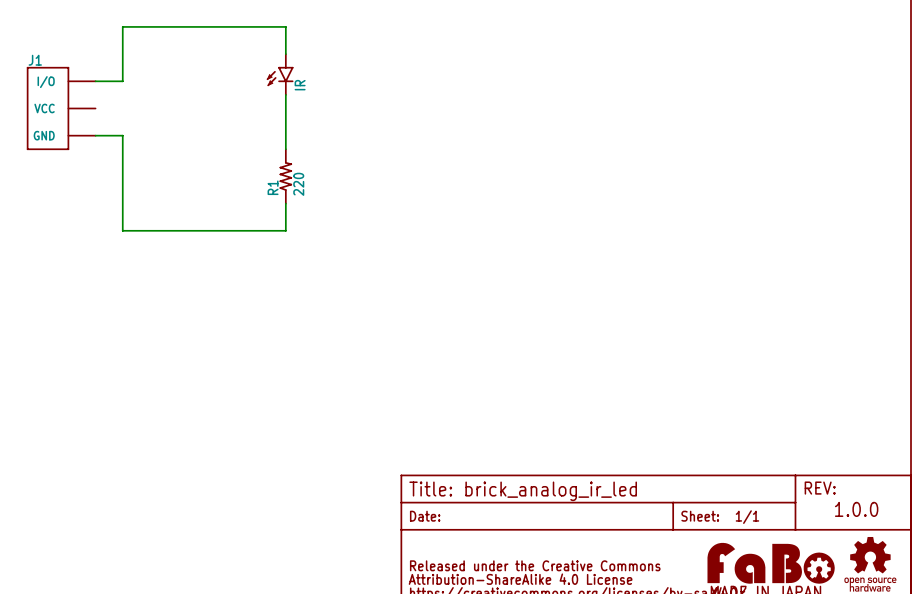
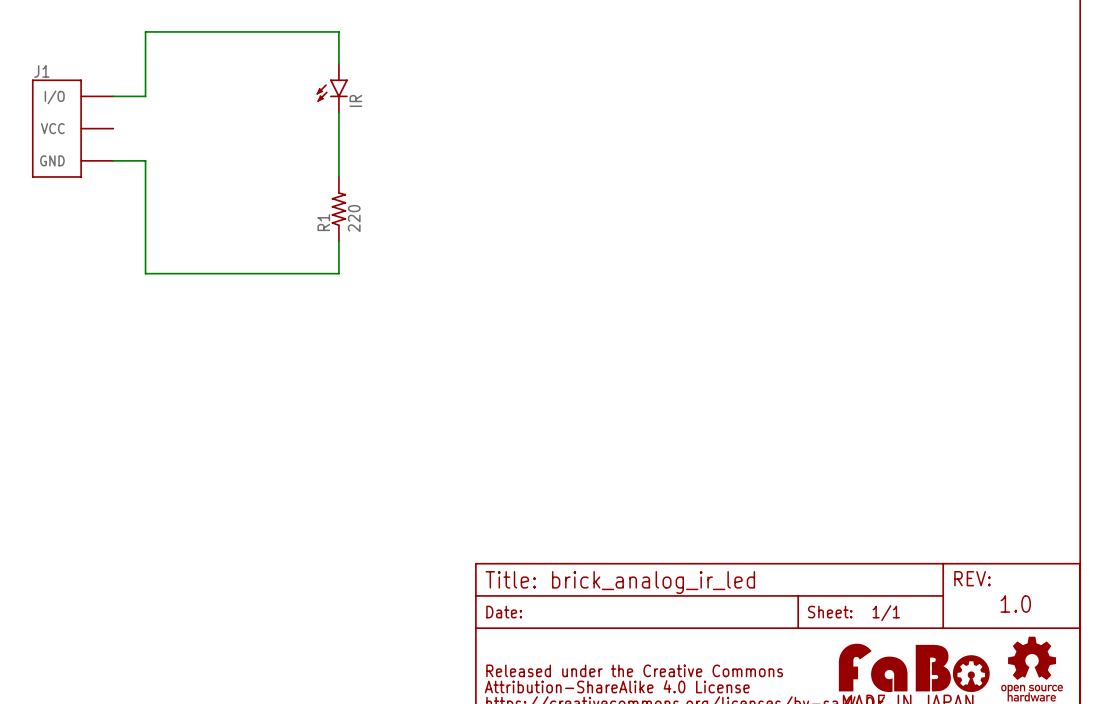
text: 1.0.0 (856, 509) -> 1.0 (1015, 604)

